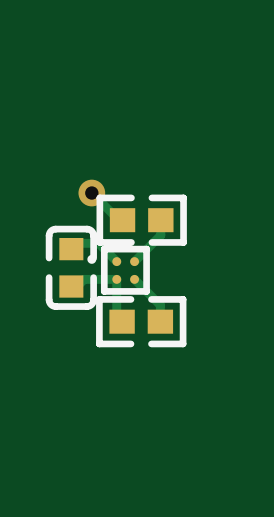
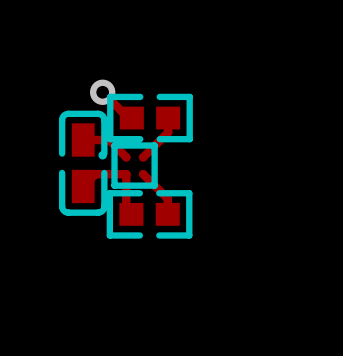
part footprint: [45, 225, 97, 310] -> [58, 110, 108, 216]

